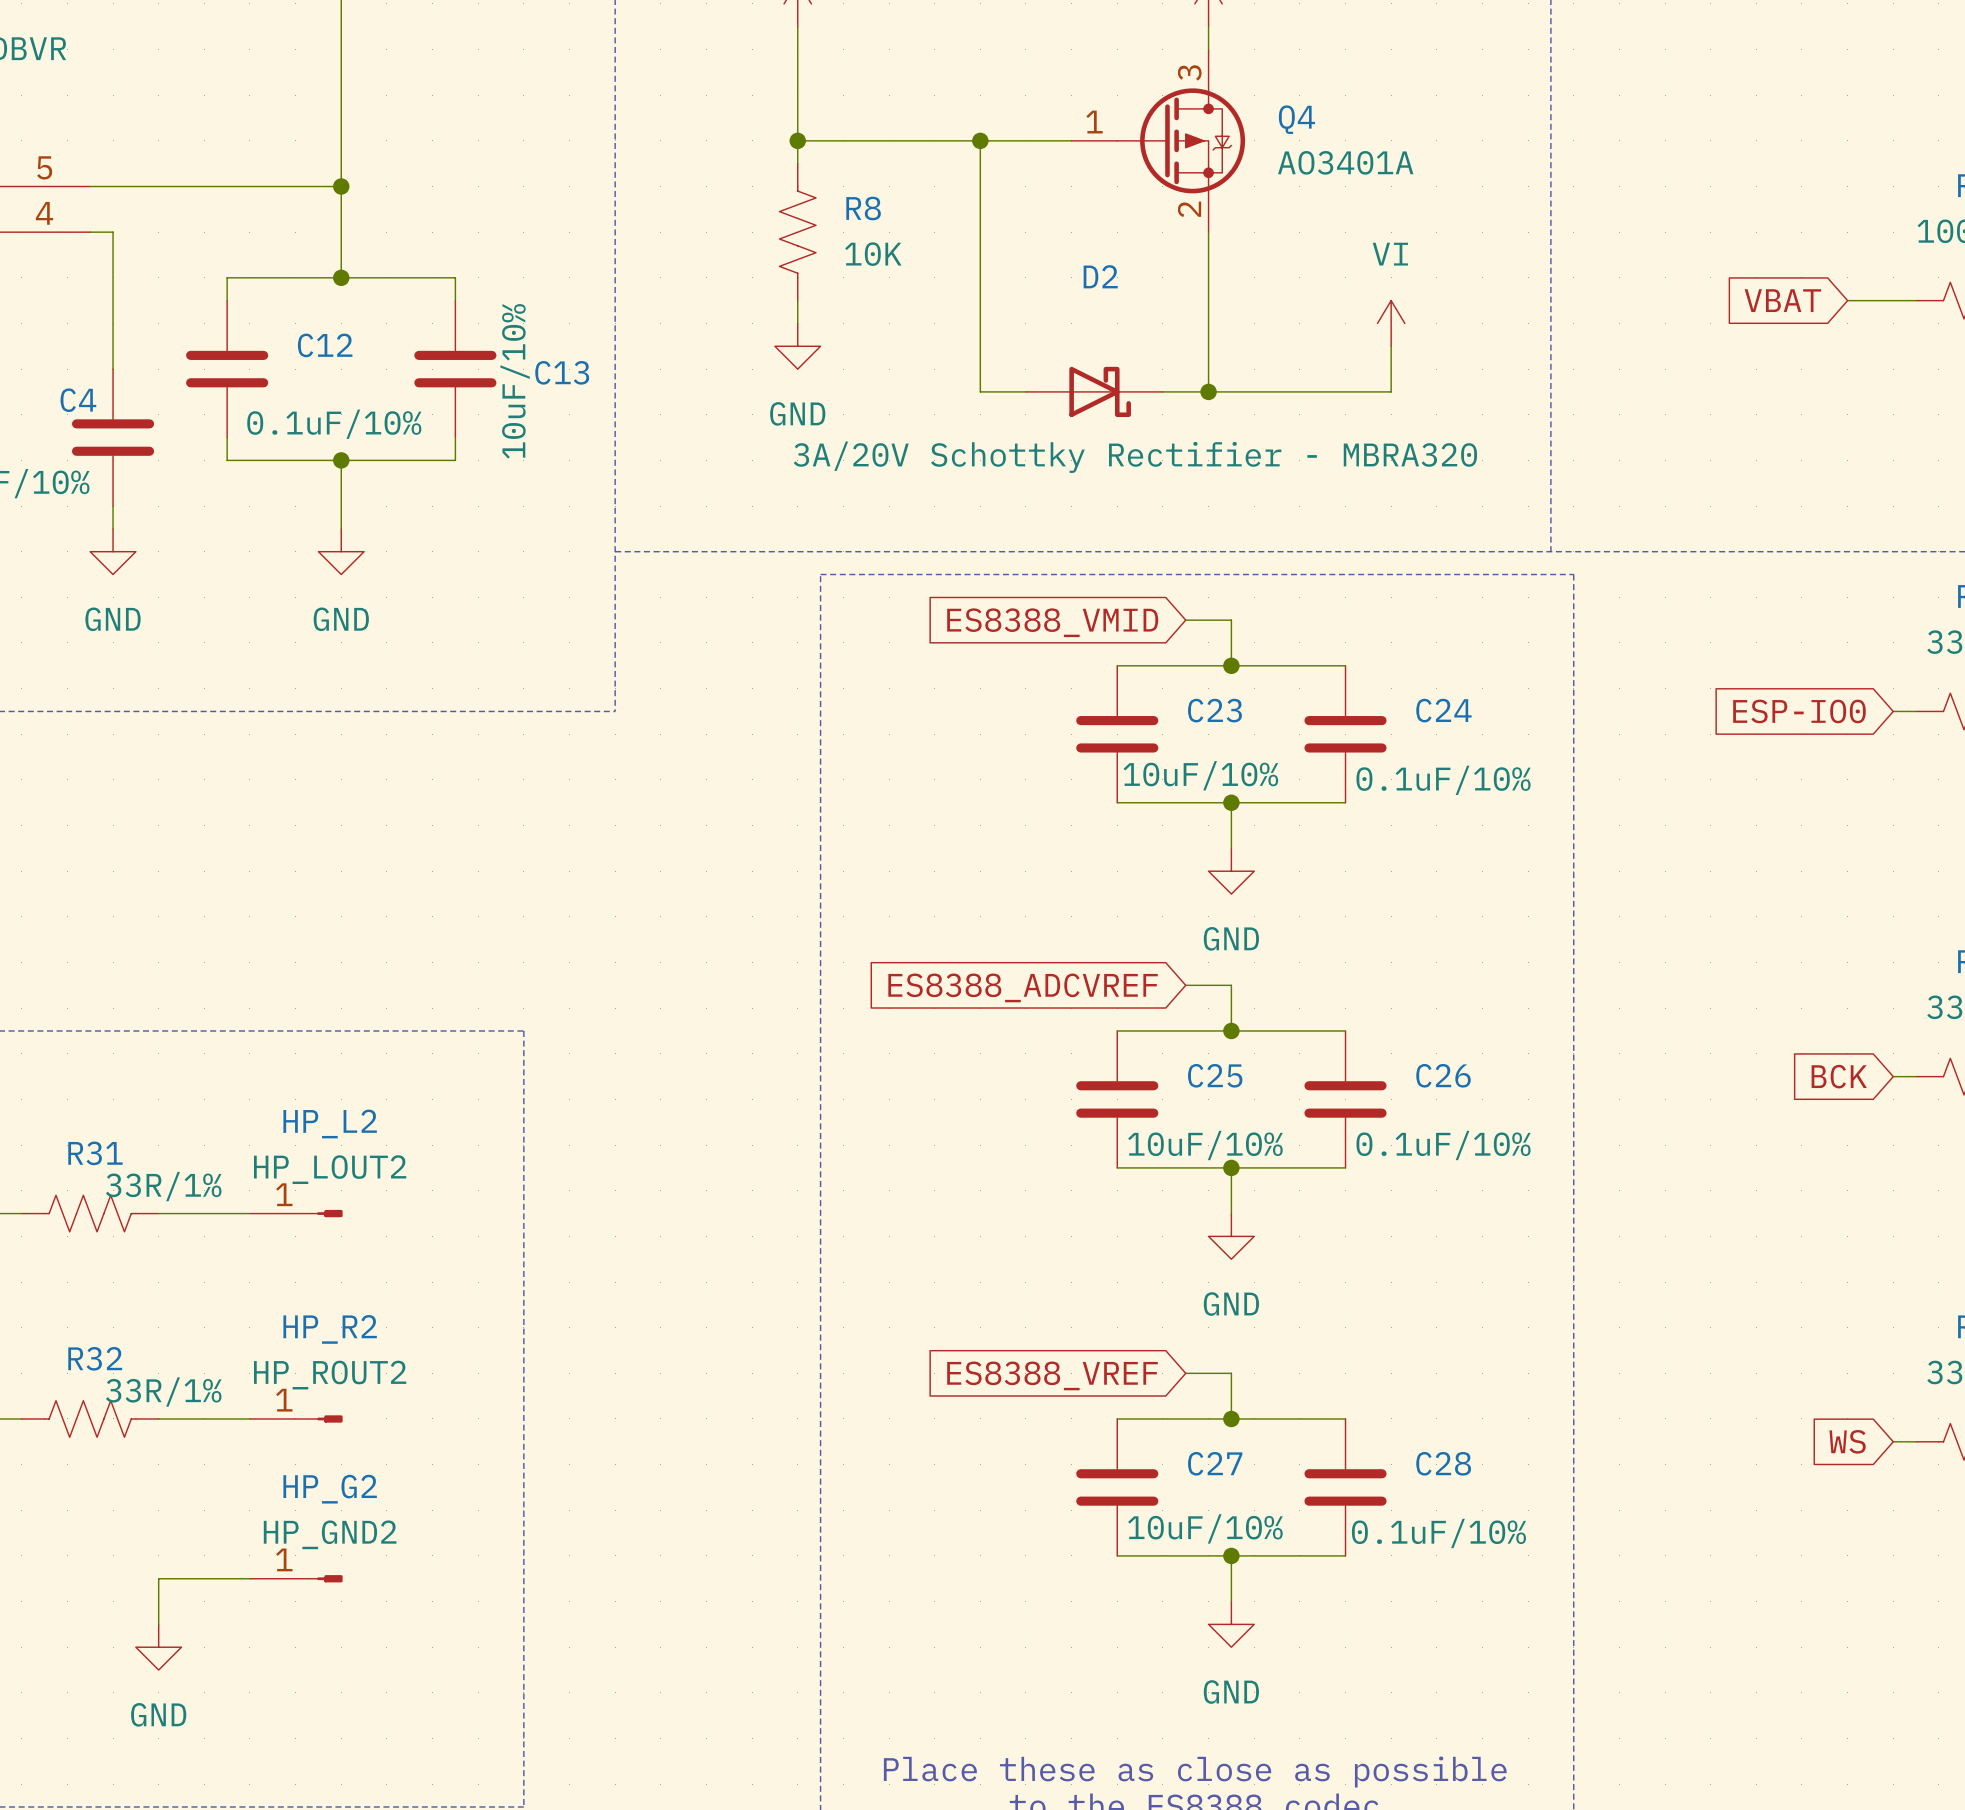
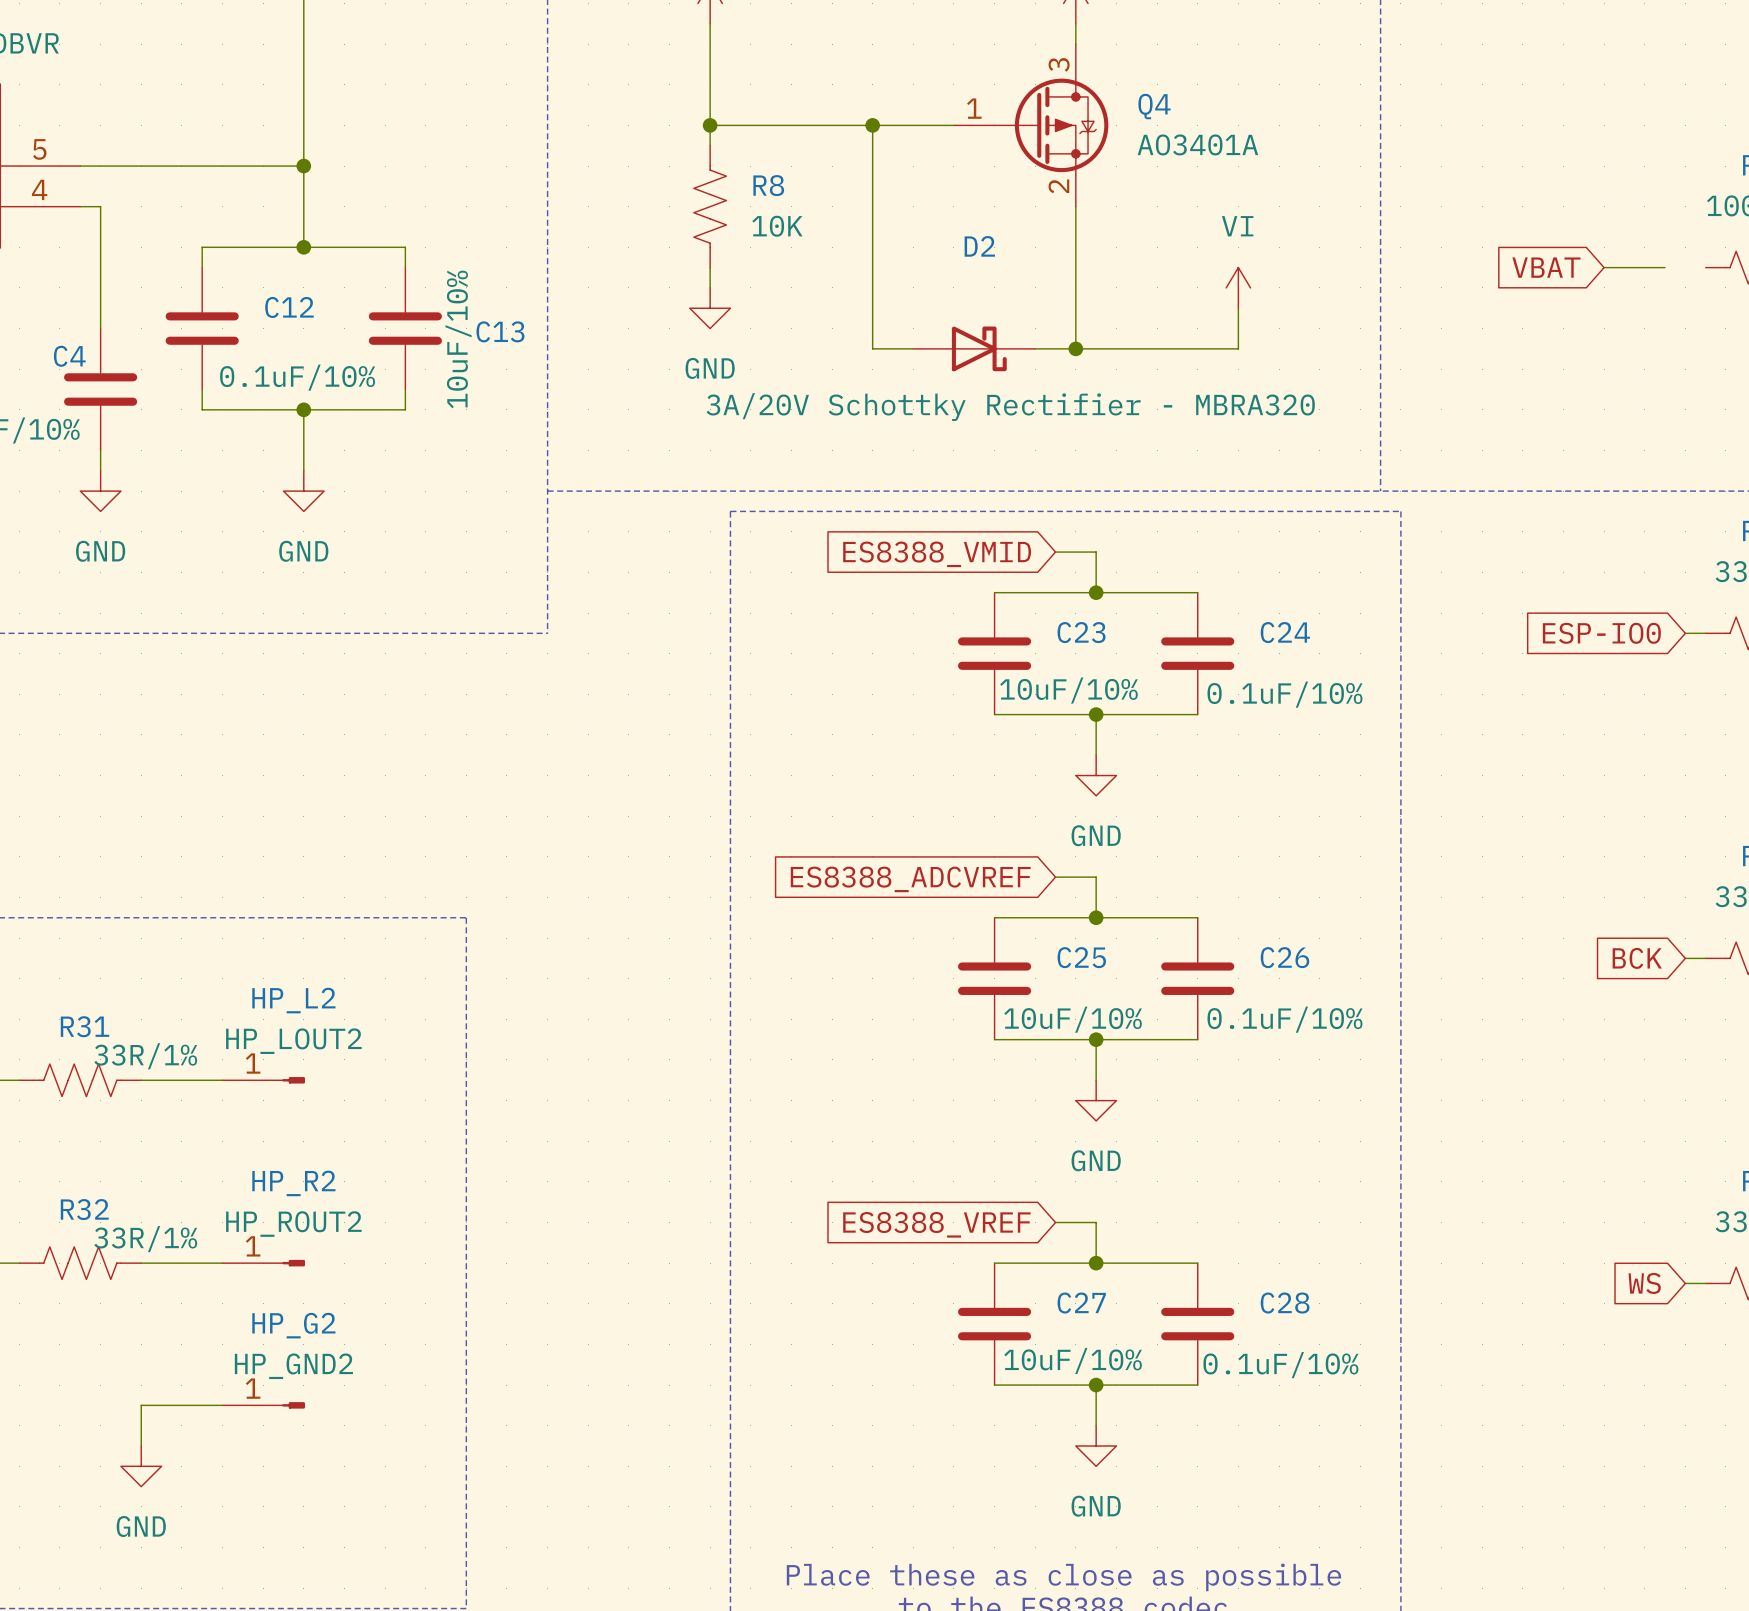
global label position: VBAT (1782, 300) -> VBAT (1546, 267)
wire: (1870, 300) (1916, 300) -> (1604, 267) (1644, 267)

